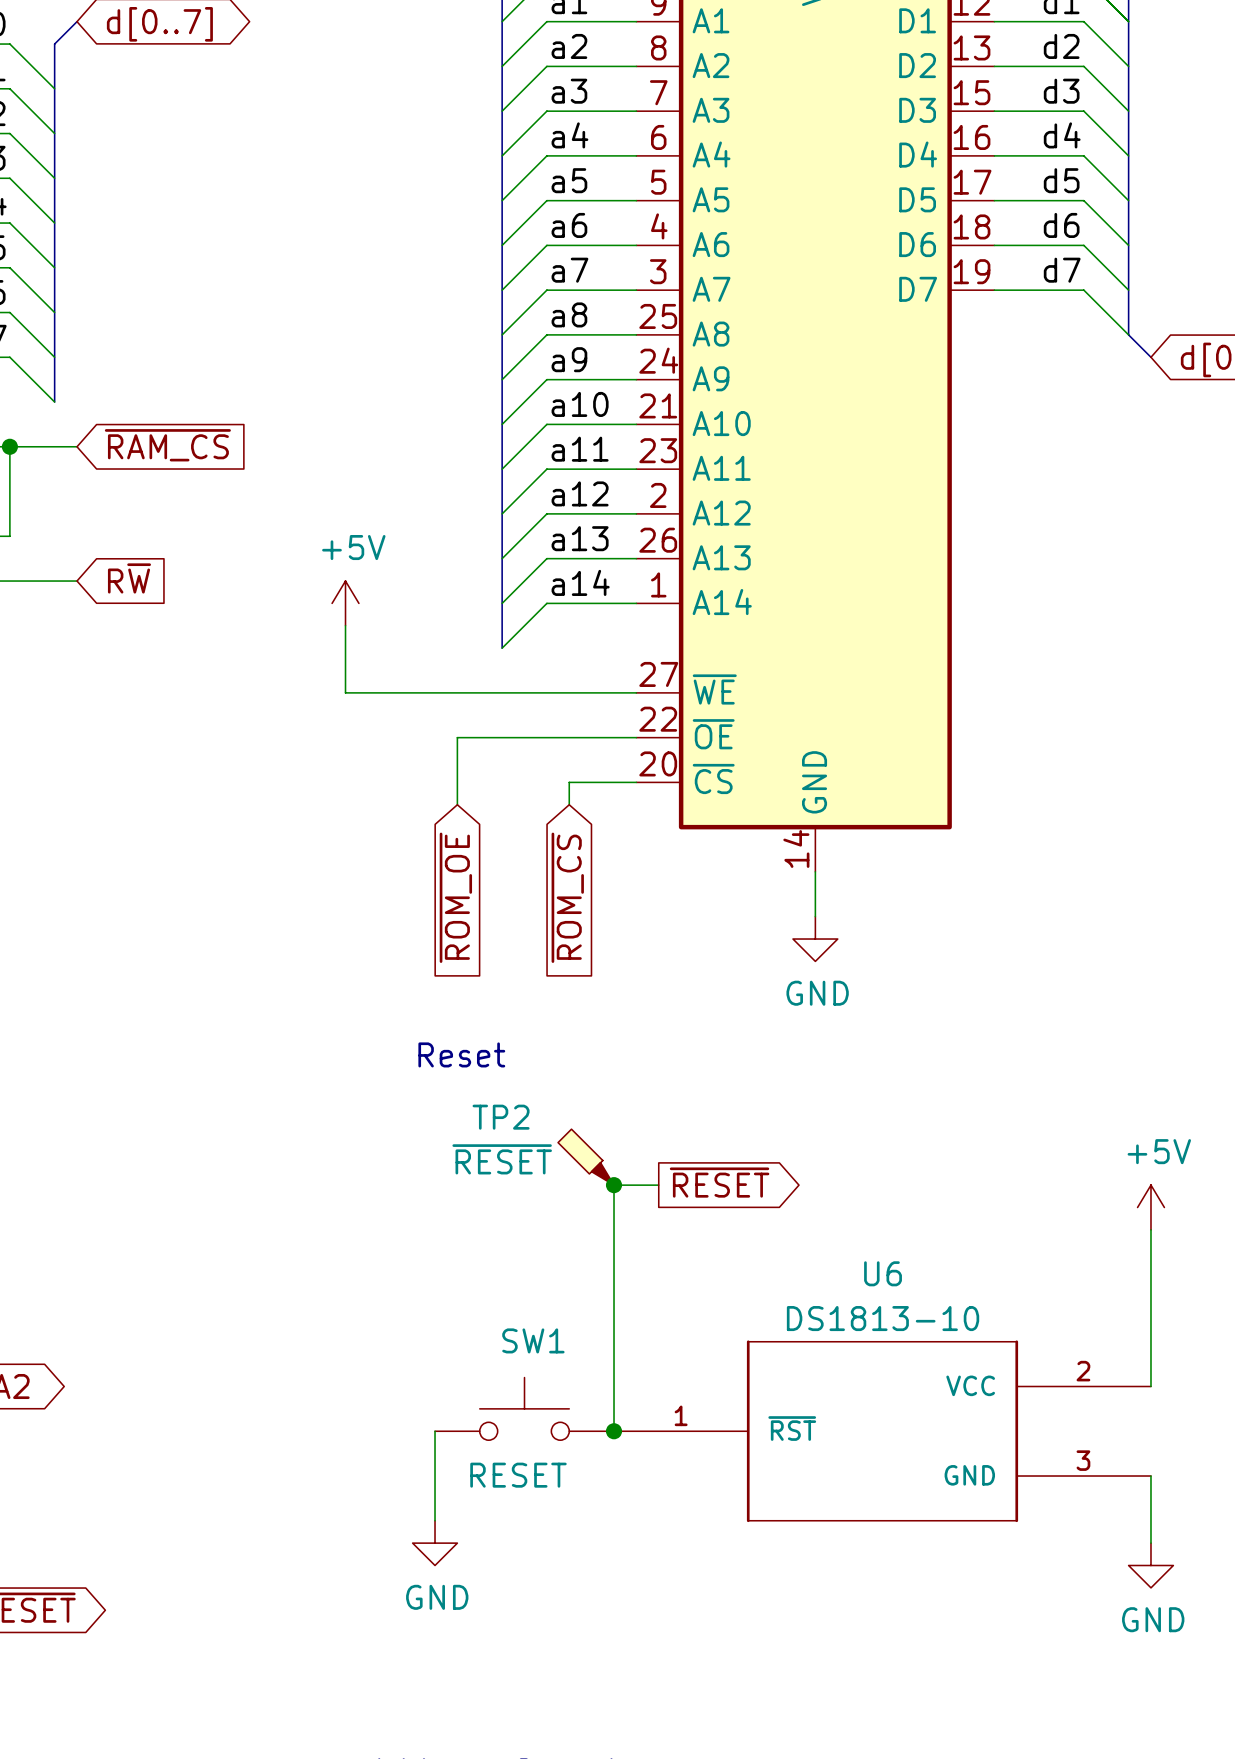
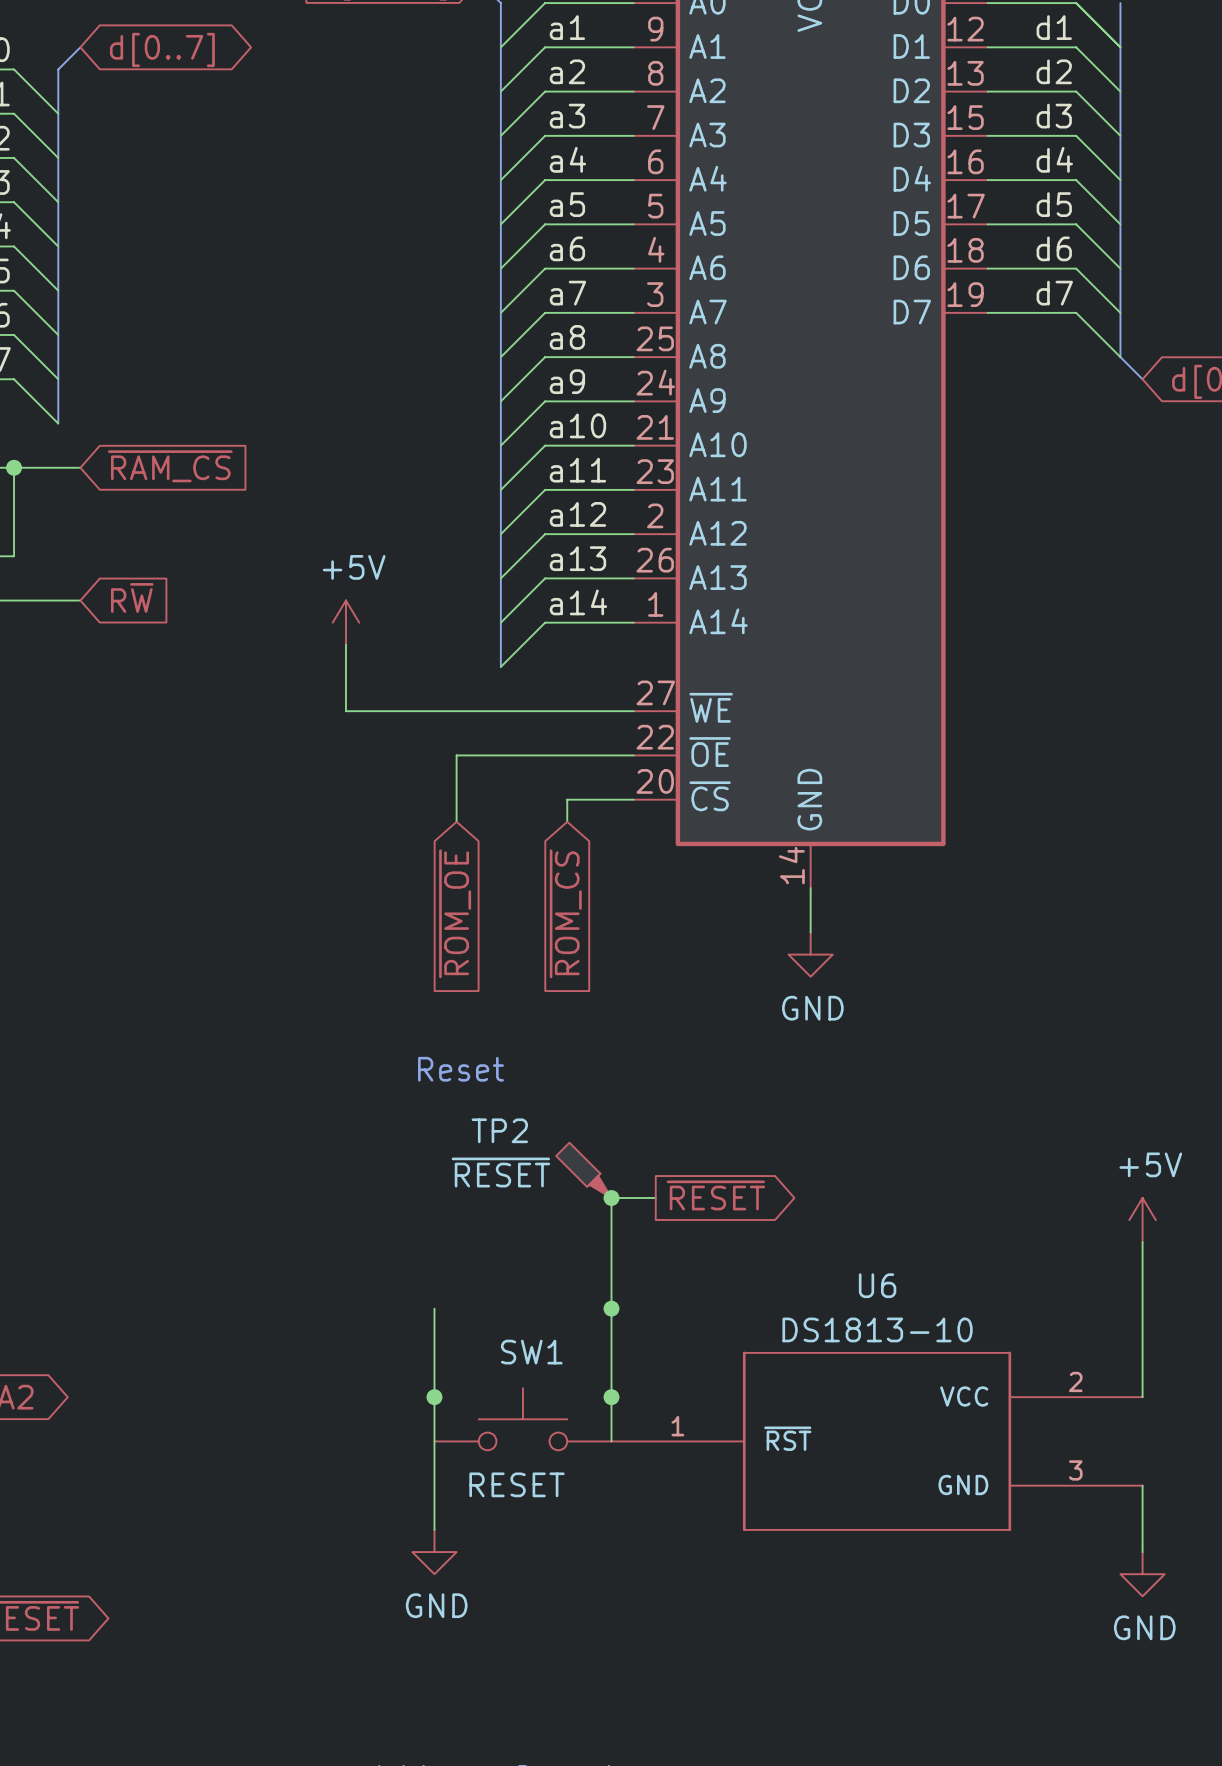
wire: none -> (434, 1308) (434, 1441)
junction: none -> (611, 1308)
junction: none -> (434, 1397)
junction position: (614, 1431) -> (611, 1397)

